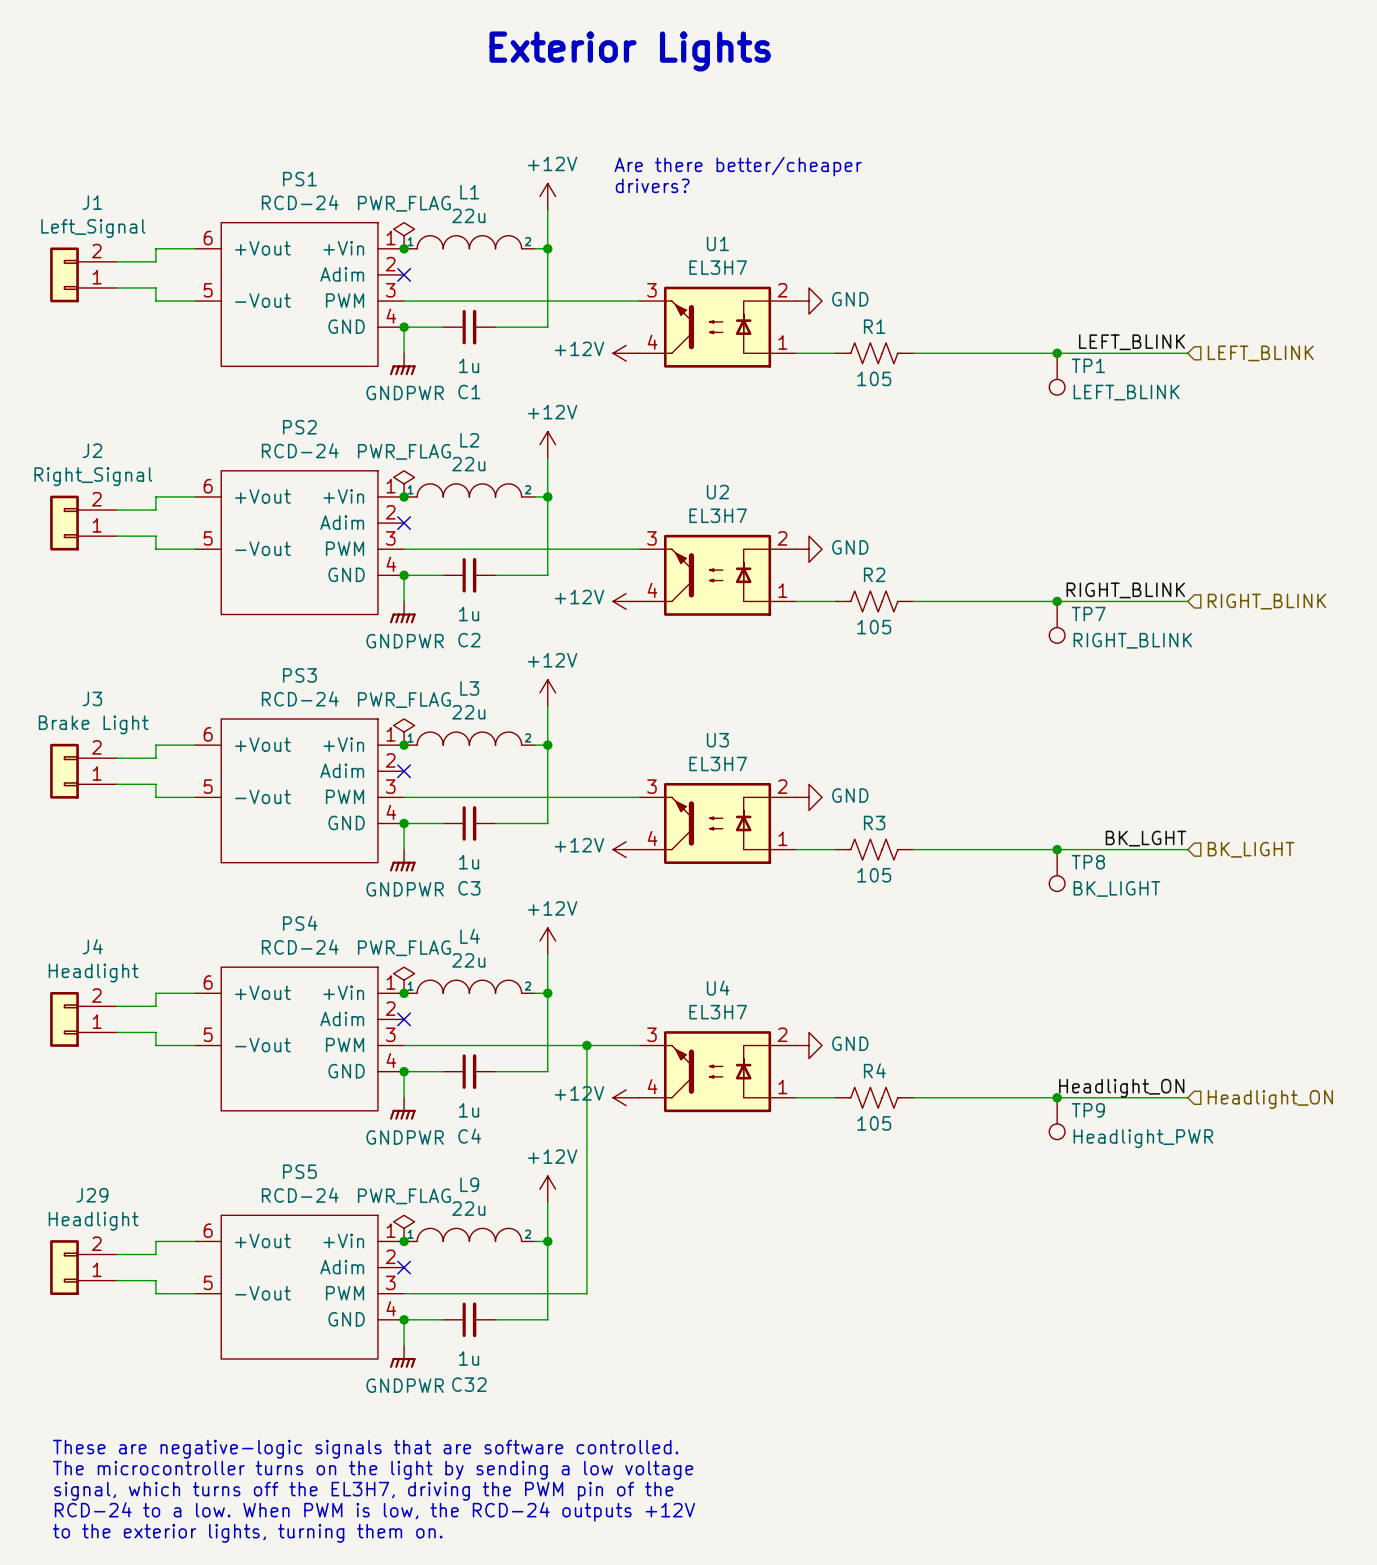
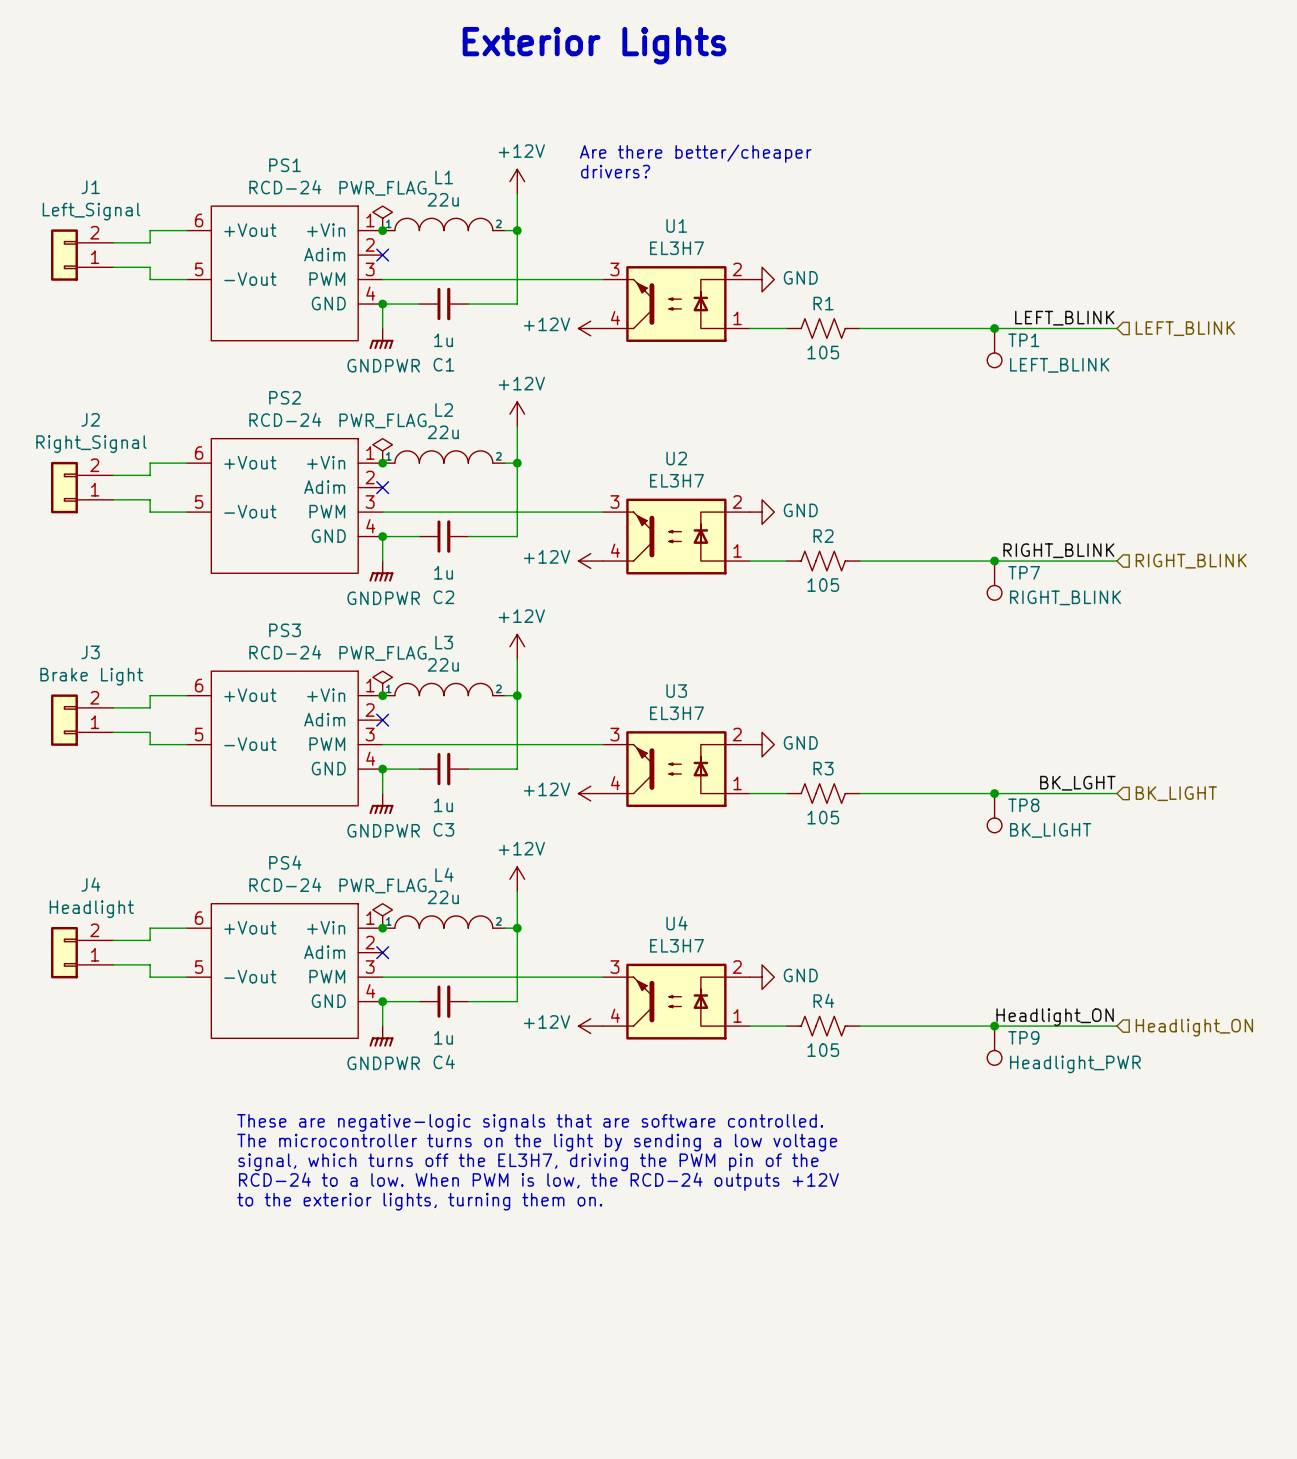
wire: (586, 1045) (586, 1293) (404, 1293) -> none
junction: (586, 1045) -> none
power symbol: +12V (547, 1189) -> none
text: none -> These are negative-logic signals that are software controlled. (530, 1122)
wire: (547, 1202) (547, 1319) (495, 1319) -> none
text: none -> The microcontroller turns on the light by sending a low voltage (537, 1142)
power symbol: PWR_FLAG (404, 1228) -> none
L9: 22u (469, 1234) -> none
wire: (195, 1241) (155, 1241) (155, 1254) (116, 1254) -> none
junction: (404, 1241) -> none
wire: (534, 1241) (547, 1241) -> none
junction: (547, 1241) -> none
text: none -> signal, which turns off the EL3H7, driving the PWM pin of the (528, 1162)
text: none -> RCD-24 to a low. When PWM is low, the RCD-24 outputs +12V (538, 1181)
J29: Headlight (83, 1267) -> none
no-connect mark: (404, 1267) -> none
wire: (116, 1280) (155, 1280) (155, 1293) (195, 1293) -> none
text: none -> to the exterior lights, turning them on. (419, 1201)
PS5: RCD-24 (299, 1287) -> none
junction: (404, 1319) -> none
wire: (443, 1319) (404, 1319) (404, 1345) -> none
C32: 1u (469, 1319) -> none
power symbol: GNDPWR (402, 1356) -> none
text: These are negative-logic signals that are software controlled. (365, 1449) -> none
text: The microcontroller turns on the light by sending a low voltage (373, 1470) -> none
text: signal, which turns off the EL3H7, driving the PWM pin of the (363, 1491) -> none
text: RCD-24 to a low. When PWM is low, the RCD-24 outputs +12V (374, 1512) -> none
text: to the exterior lights, turning them on. (247, 1533) -> none

